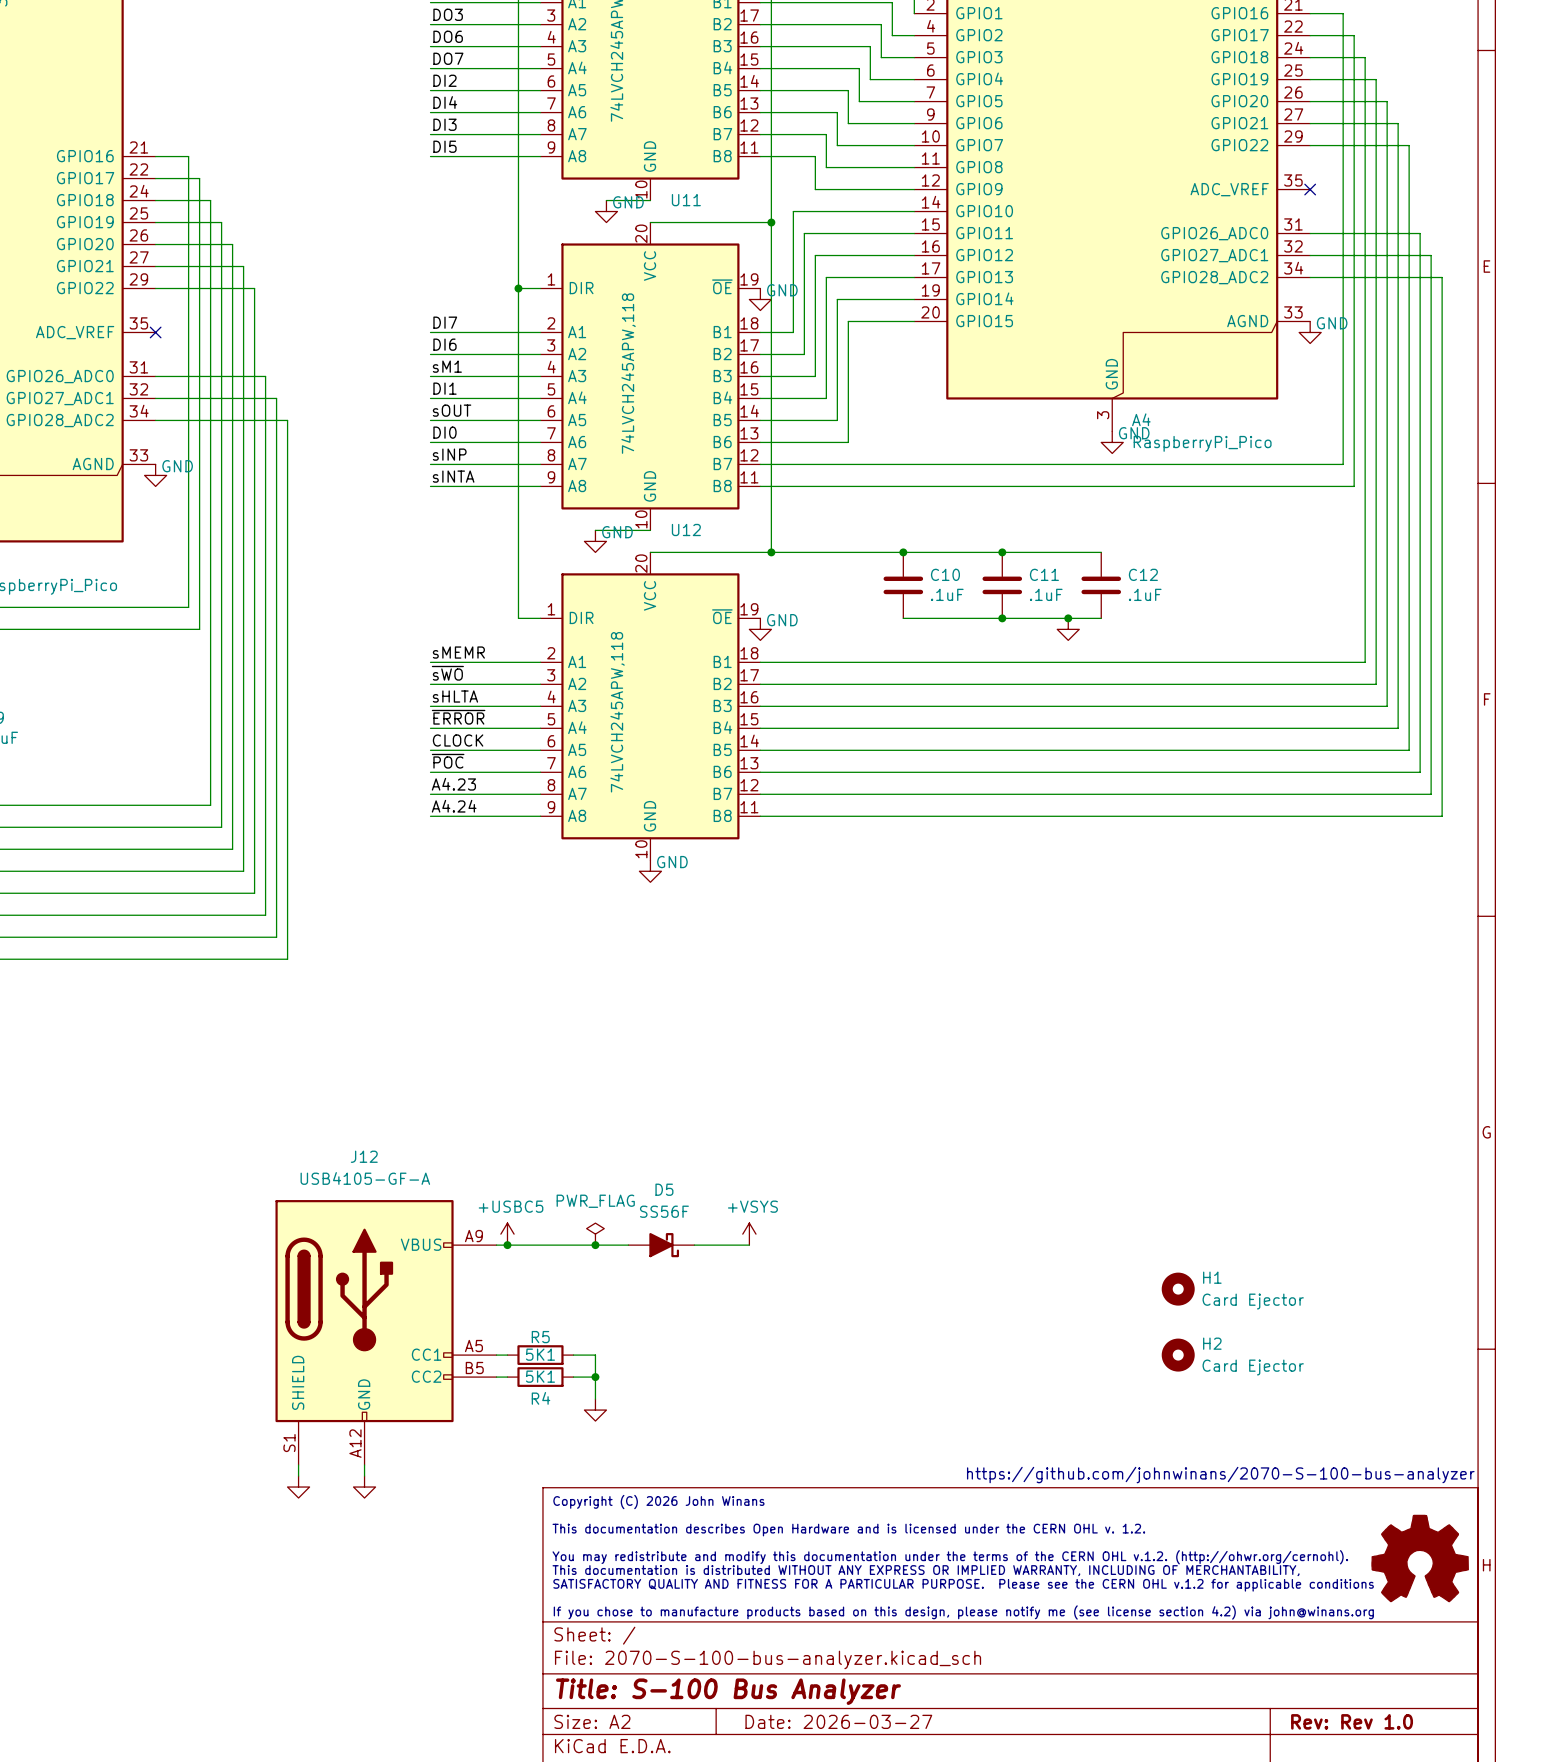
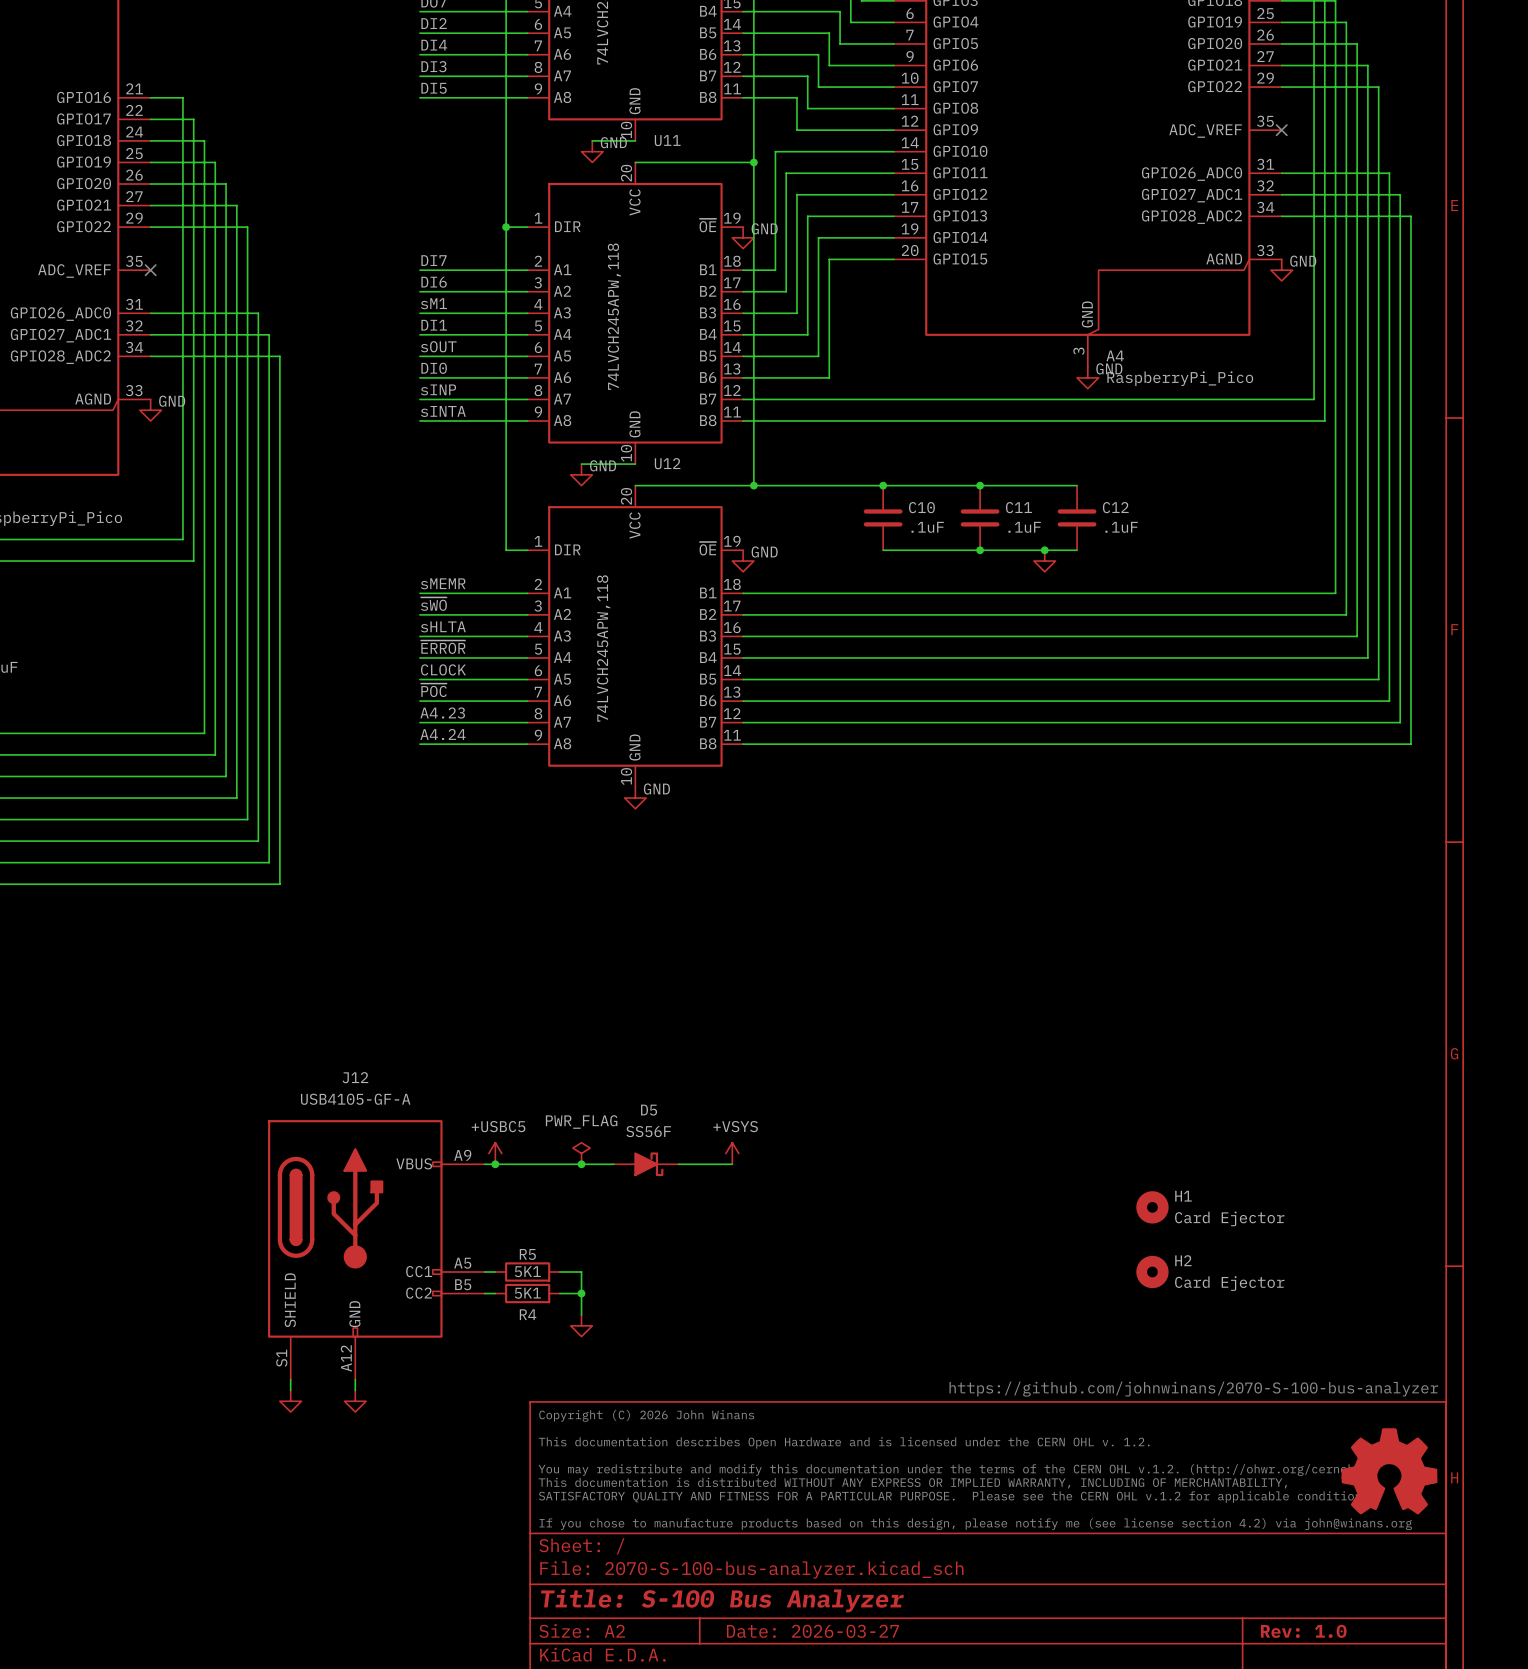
title block: Rev: Rev 1.0 (1352, 1721) -> Rev: 1.0 (1303, 1631)

